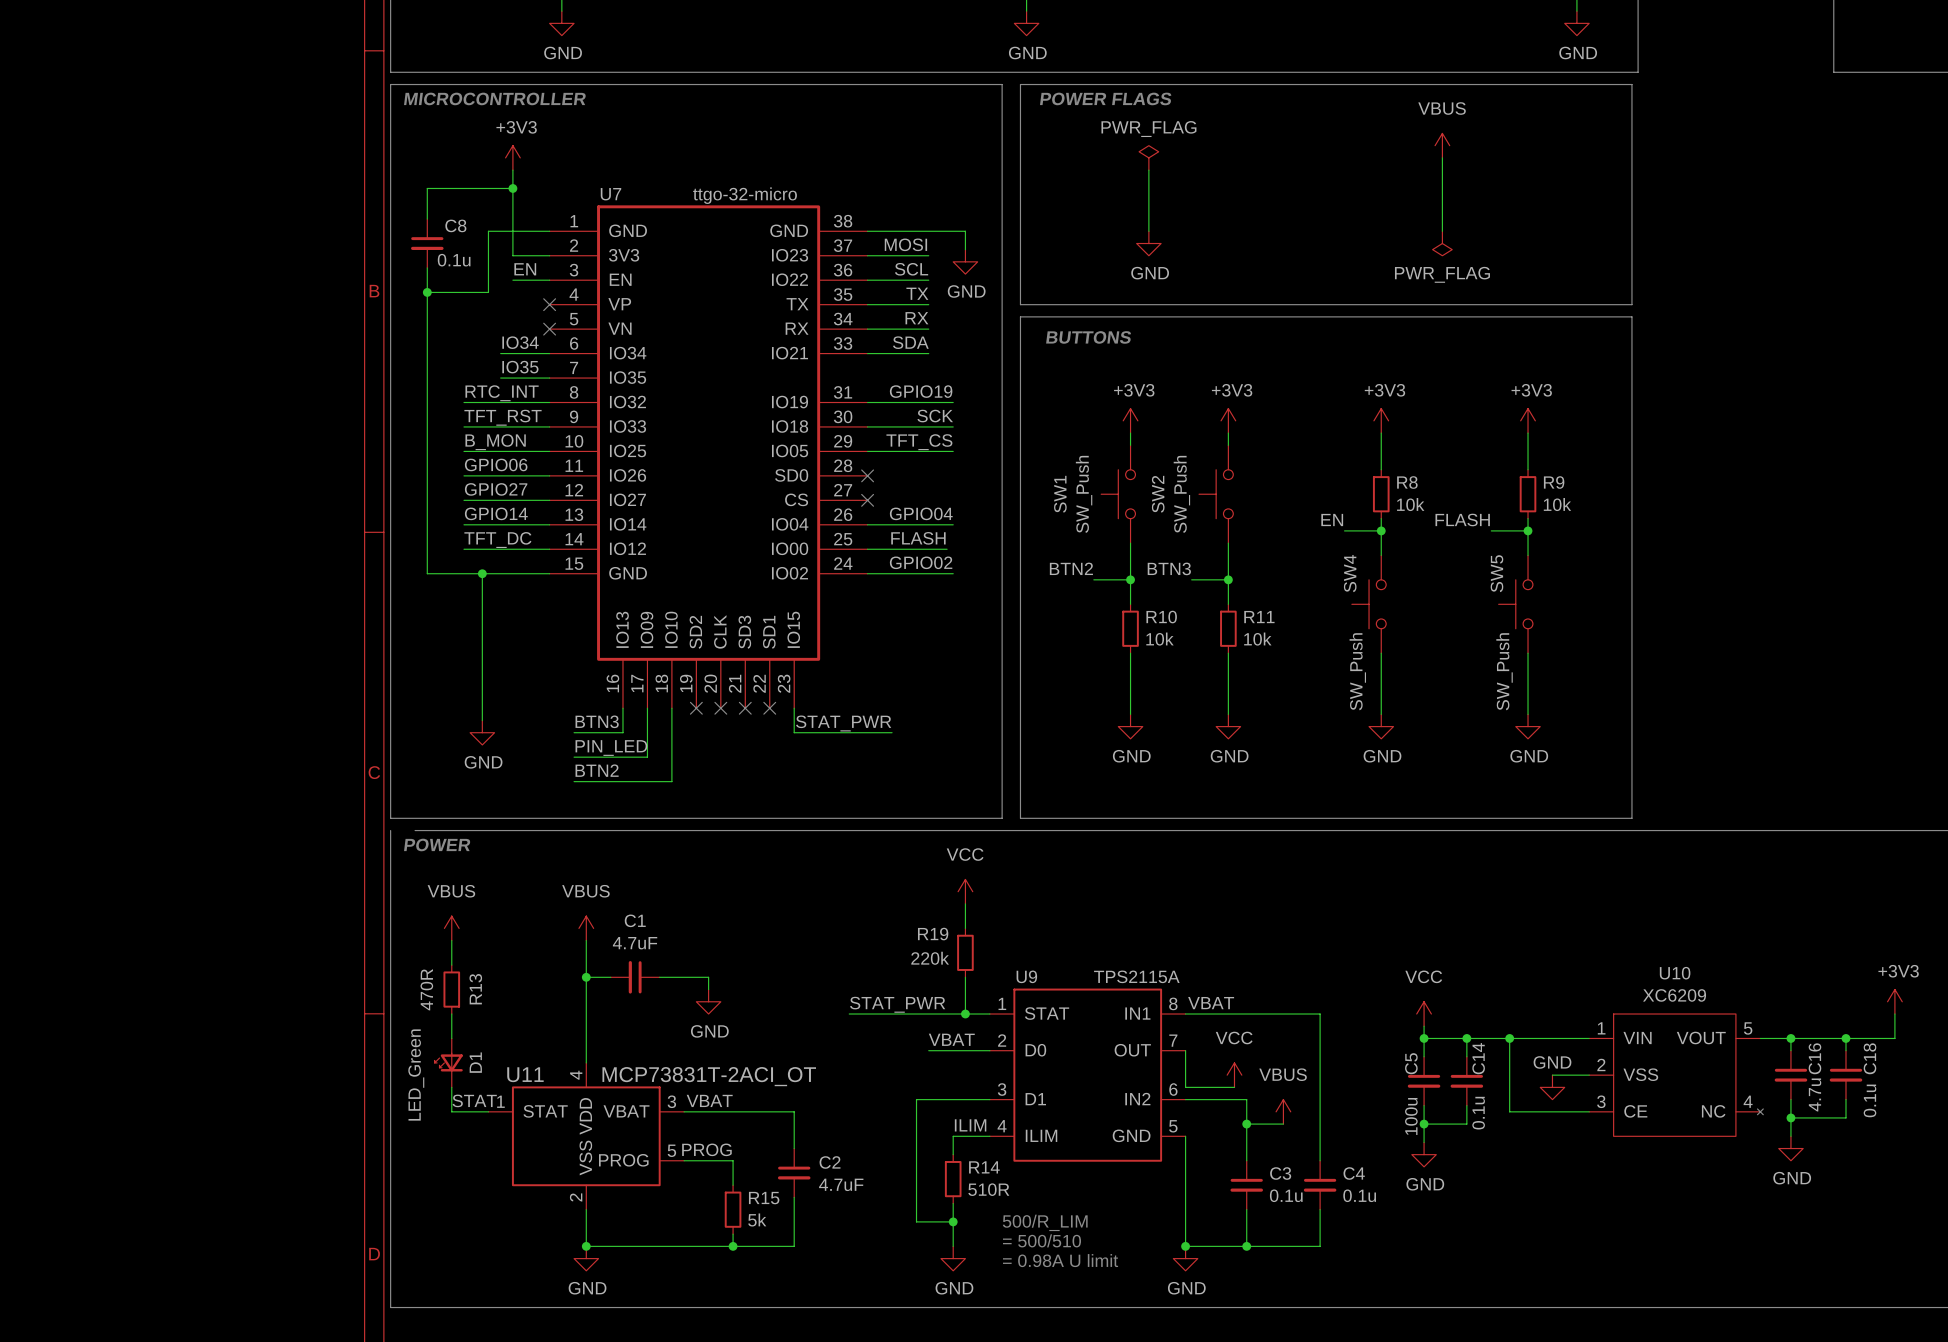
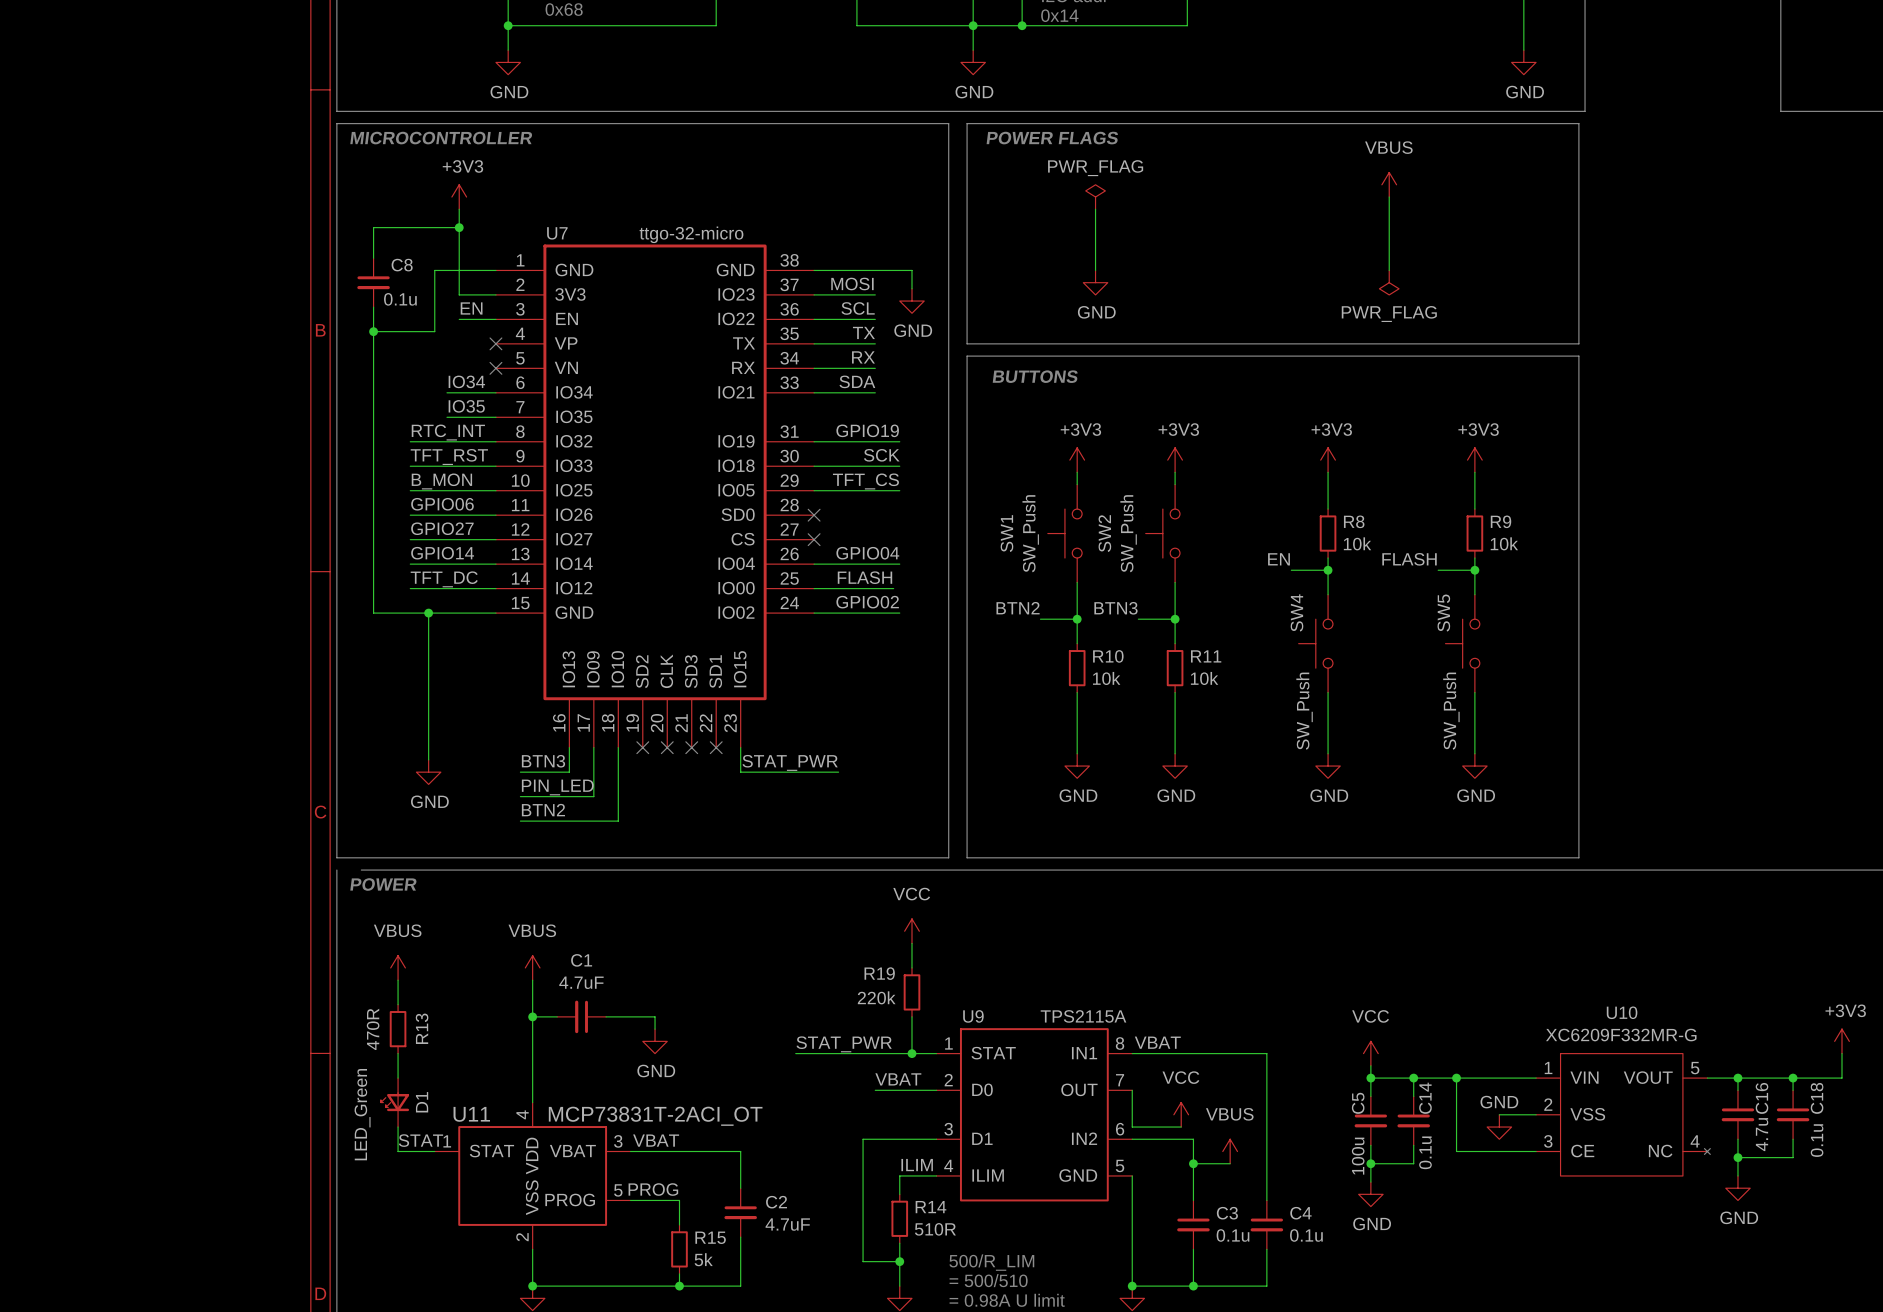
U10 value: XC6209 (1674, 995) -> XC6209F332MR-G (1621, 1035)

